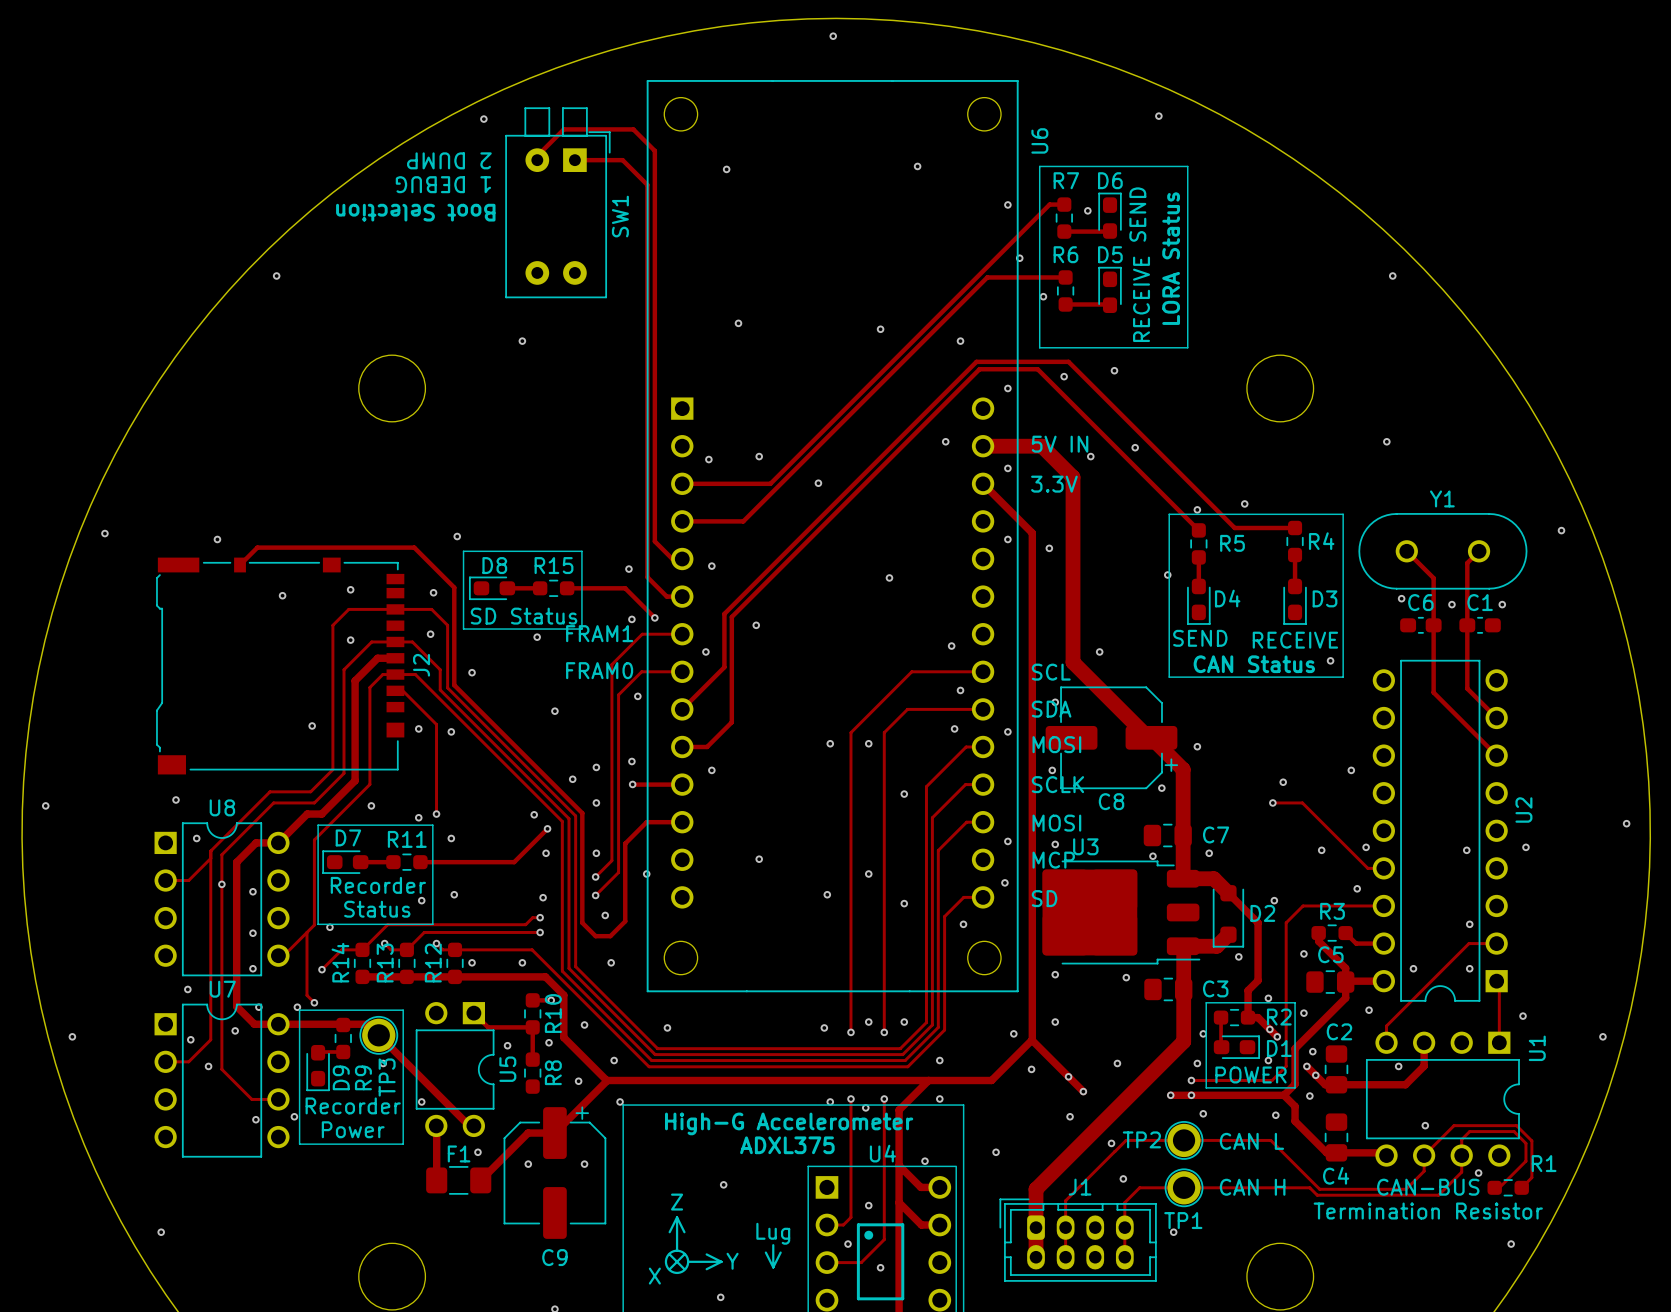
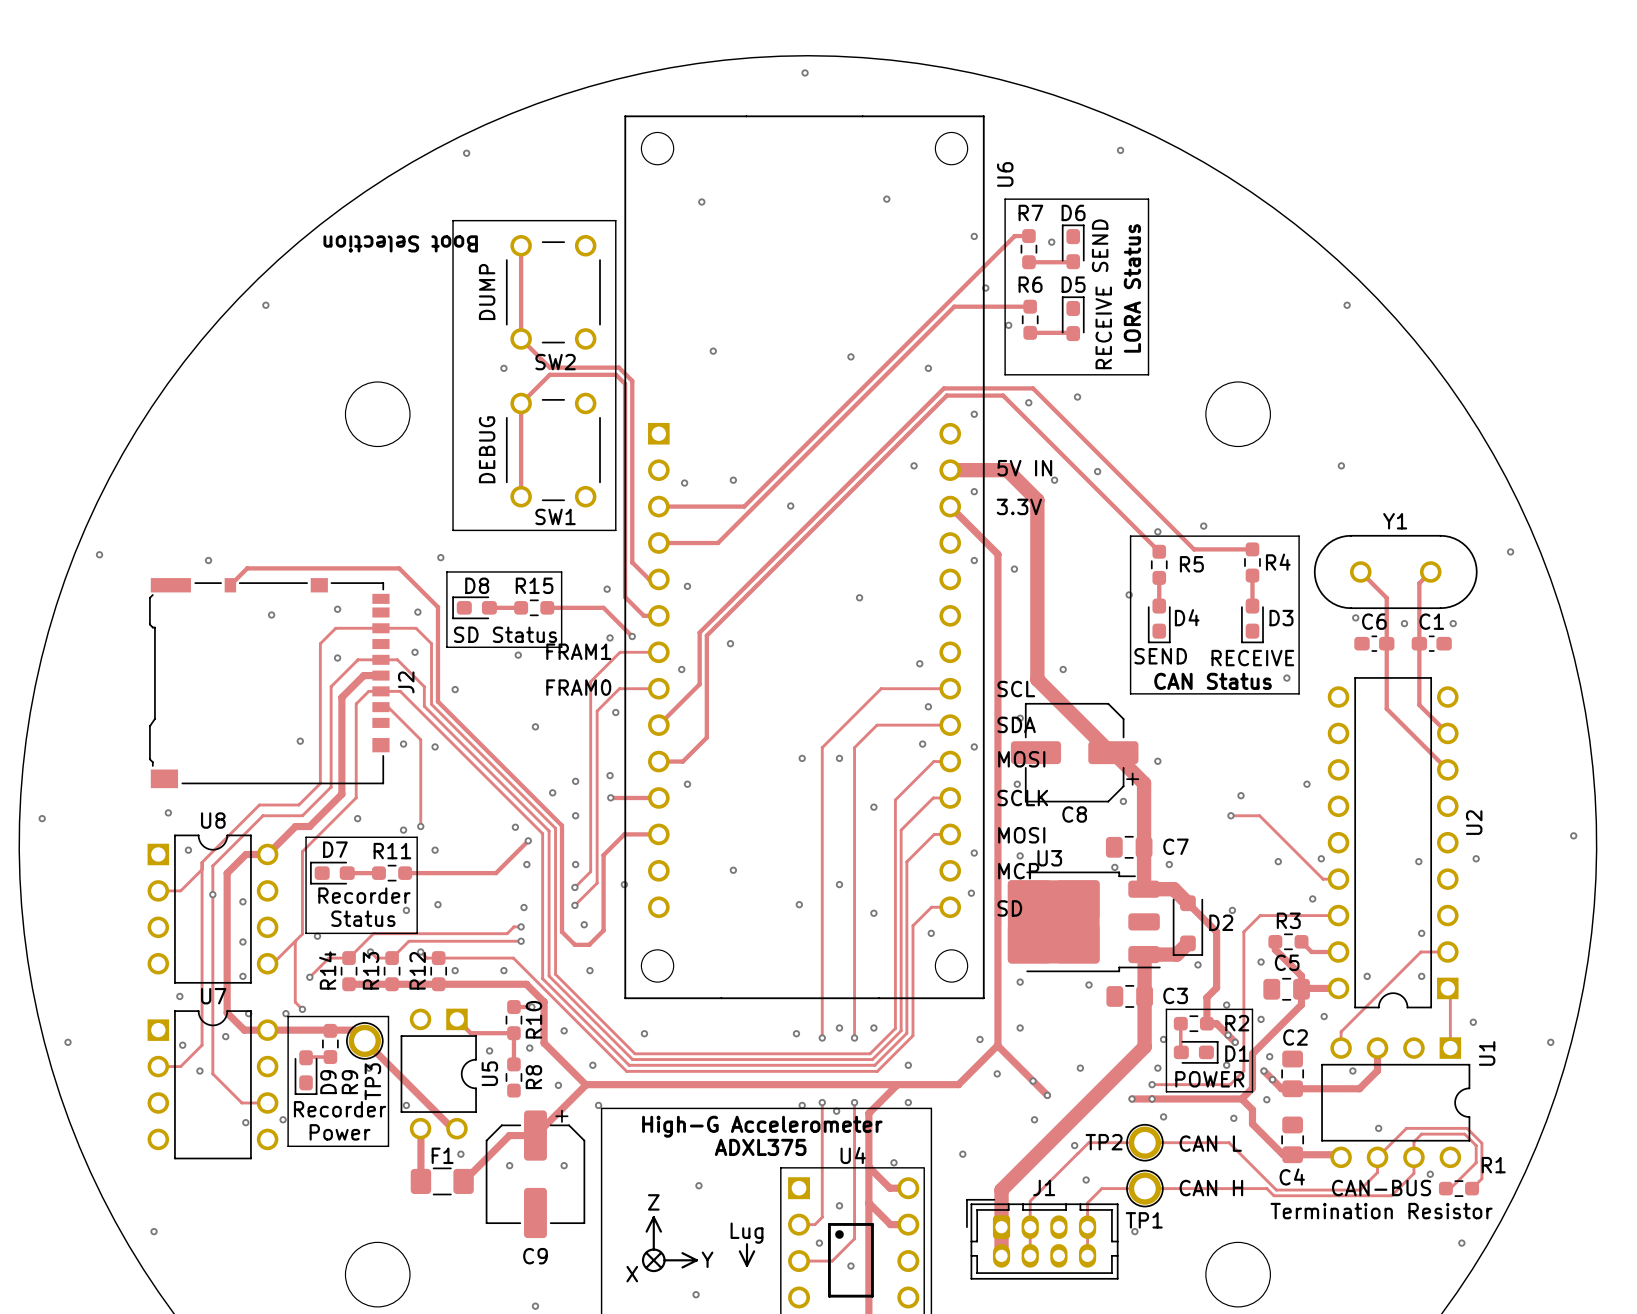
SW1 footprint: [505, 107, 611, 299] -> [505, 392, 601, 508]
text: 2 DUMP (449, 160) -> none
track: (537, 160) (537, 155) (563, 129) (633, 129) (654, 150) (654, 354) -> (521, 245) (521, 338) (549, 367) (618, 367) (632, 380)
track: (574, 160) (622, 160) (647, 184) (647, 357) -> (521, 496) (521, 403) (549, 374) (615, 374) (625, 383)
text: 1 DEBUG (443, 184) -> none
line: none -> (453, 220) (615, 220) (615, 530) (453, 530) (453, 220)
SW1 name position: SW1 (620, 216) -> SW1 (555, 516)
text: none -> DUMP (487, 292)
SW2: none -> (553, 292)
text: none -> DEBUG (487, 449)

